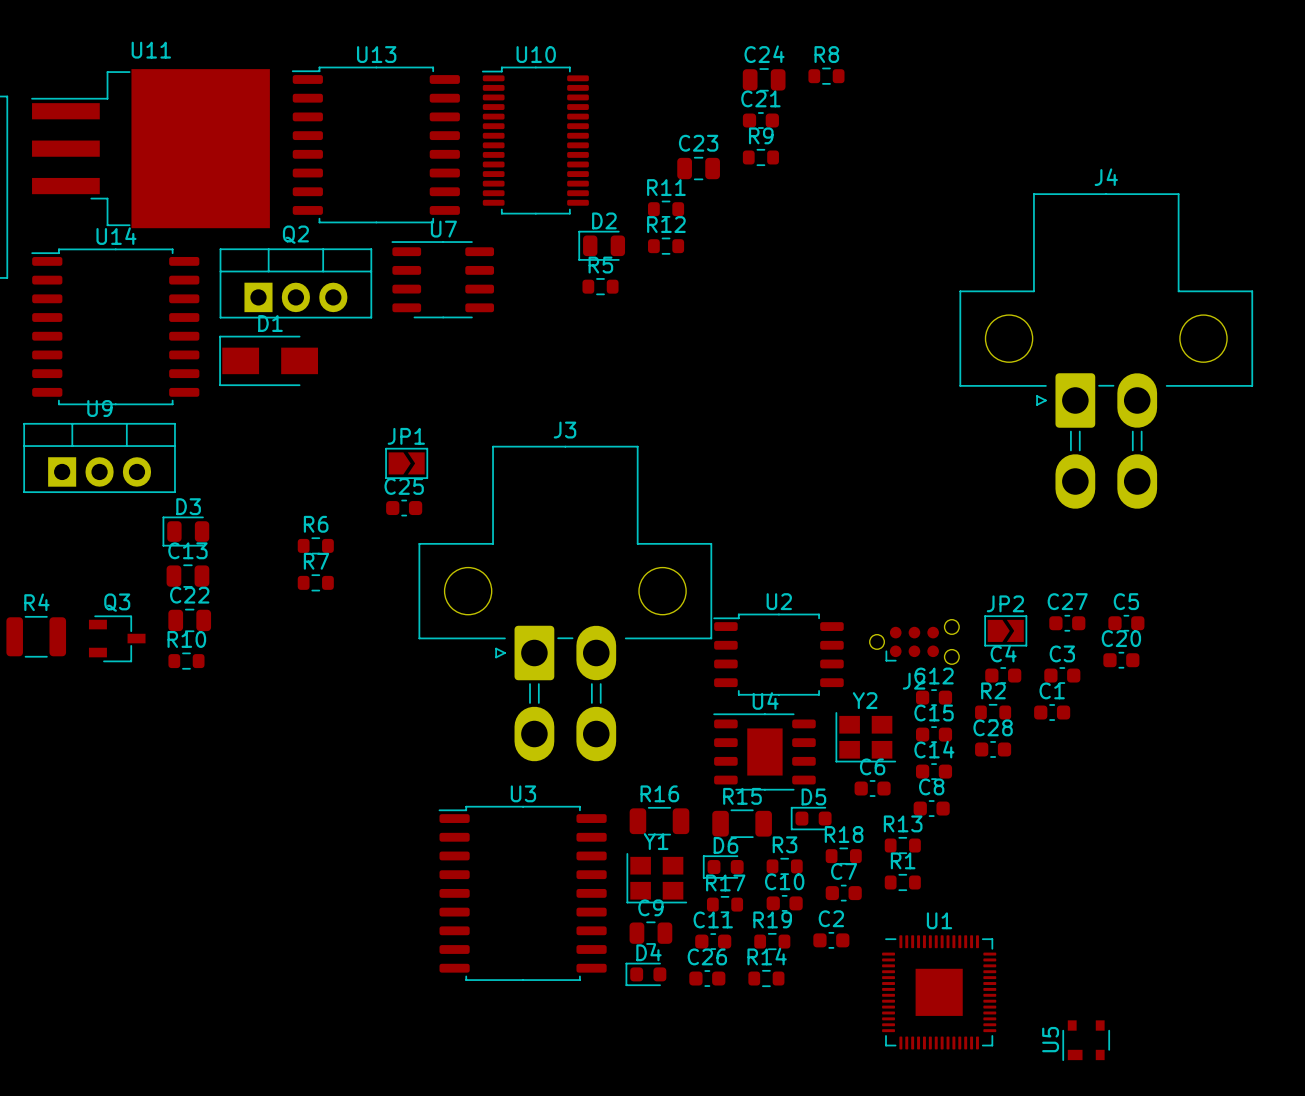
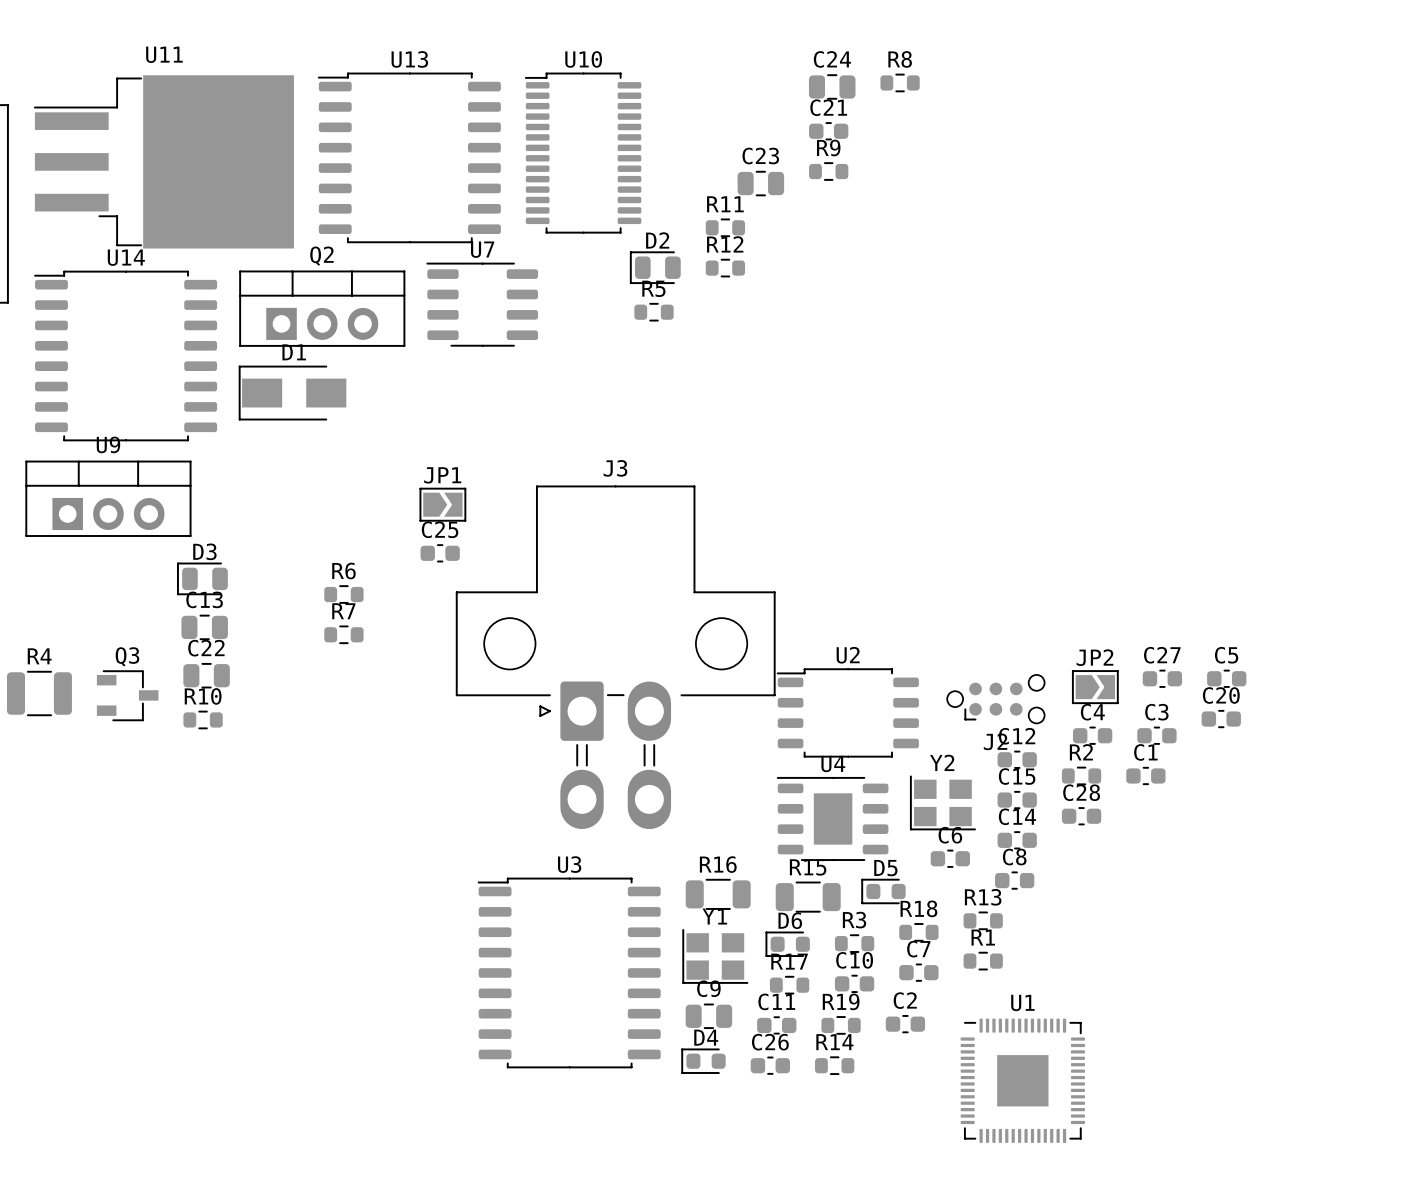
J4: (1106, 351) -> none
U5: (1086, 1040) -> none

